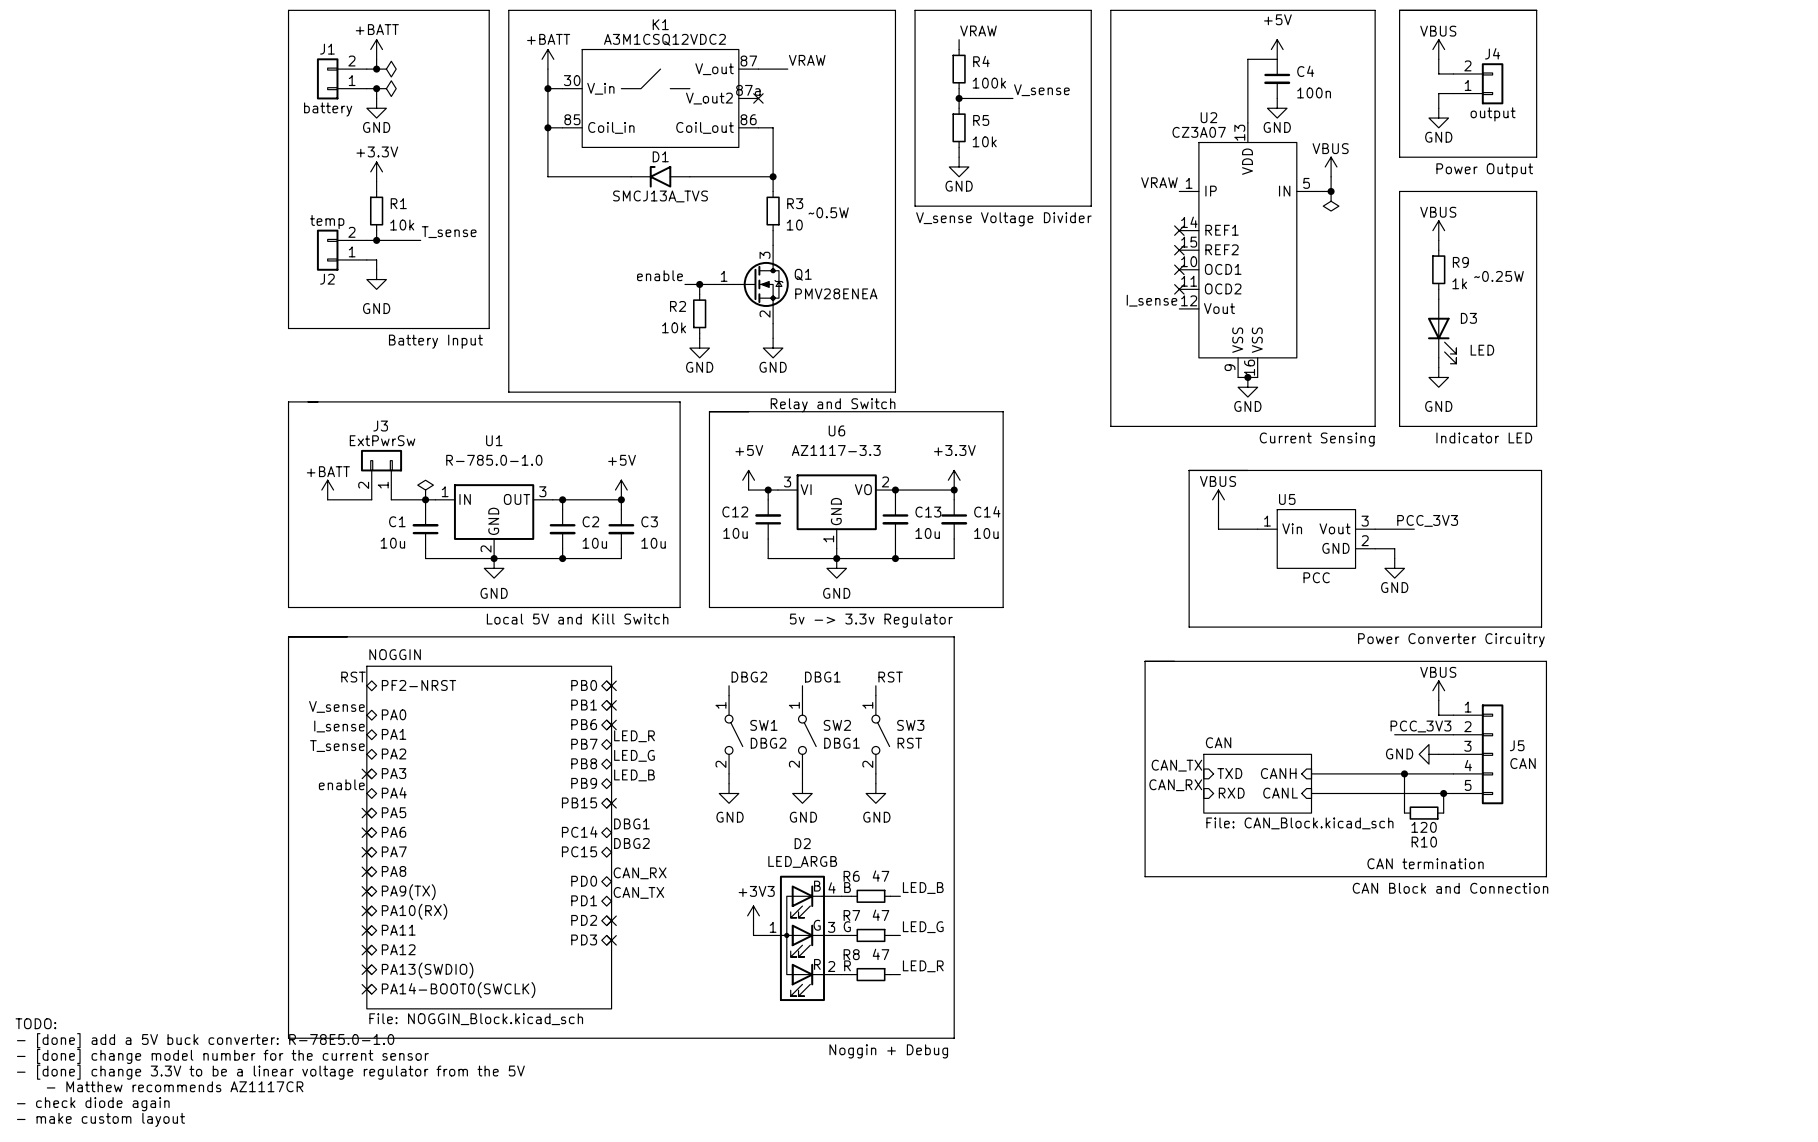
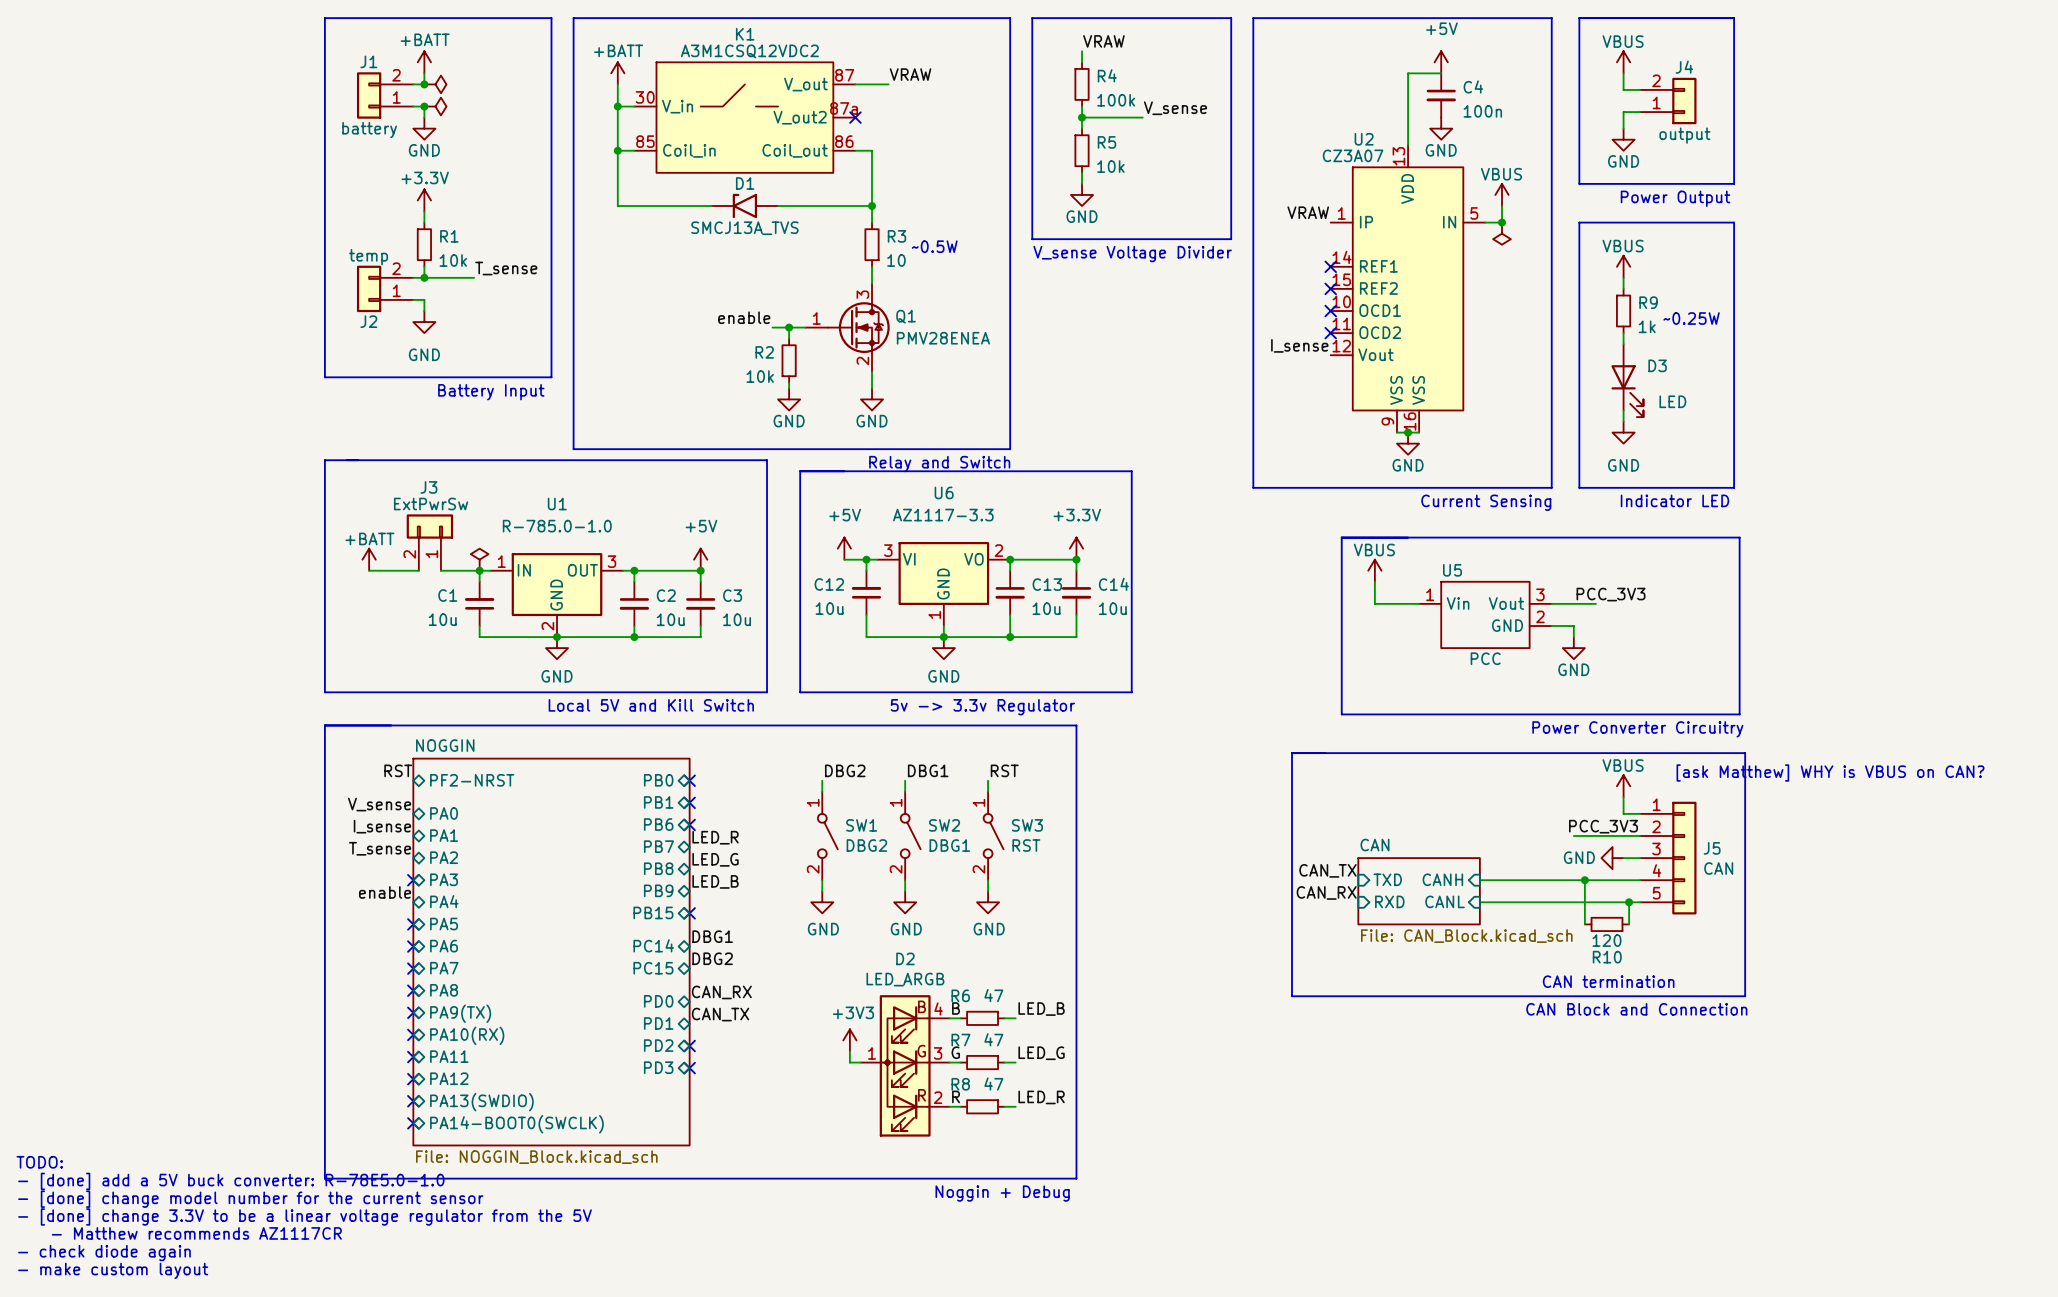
text: none -> [ask Matthew] WHY is VBUS on CAN? (1830, 773)

